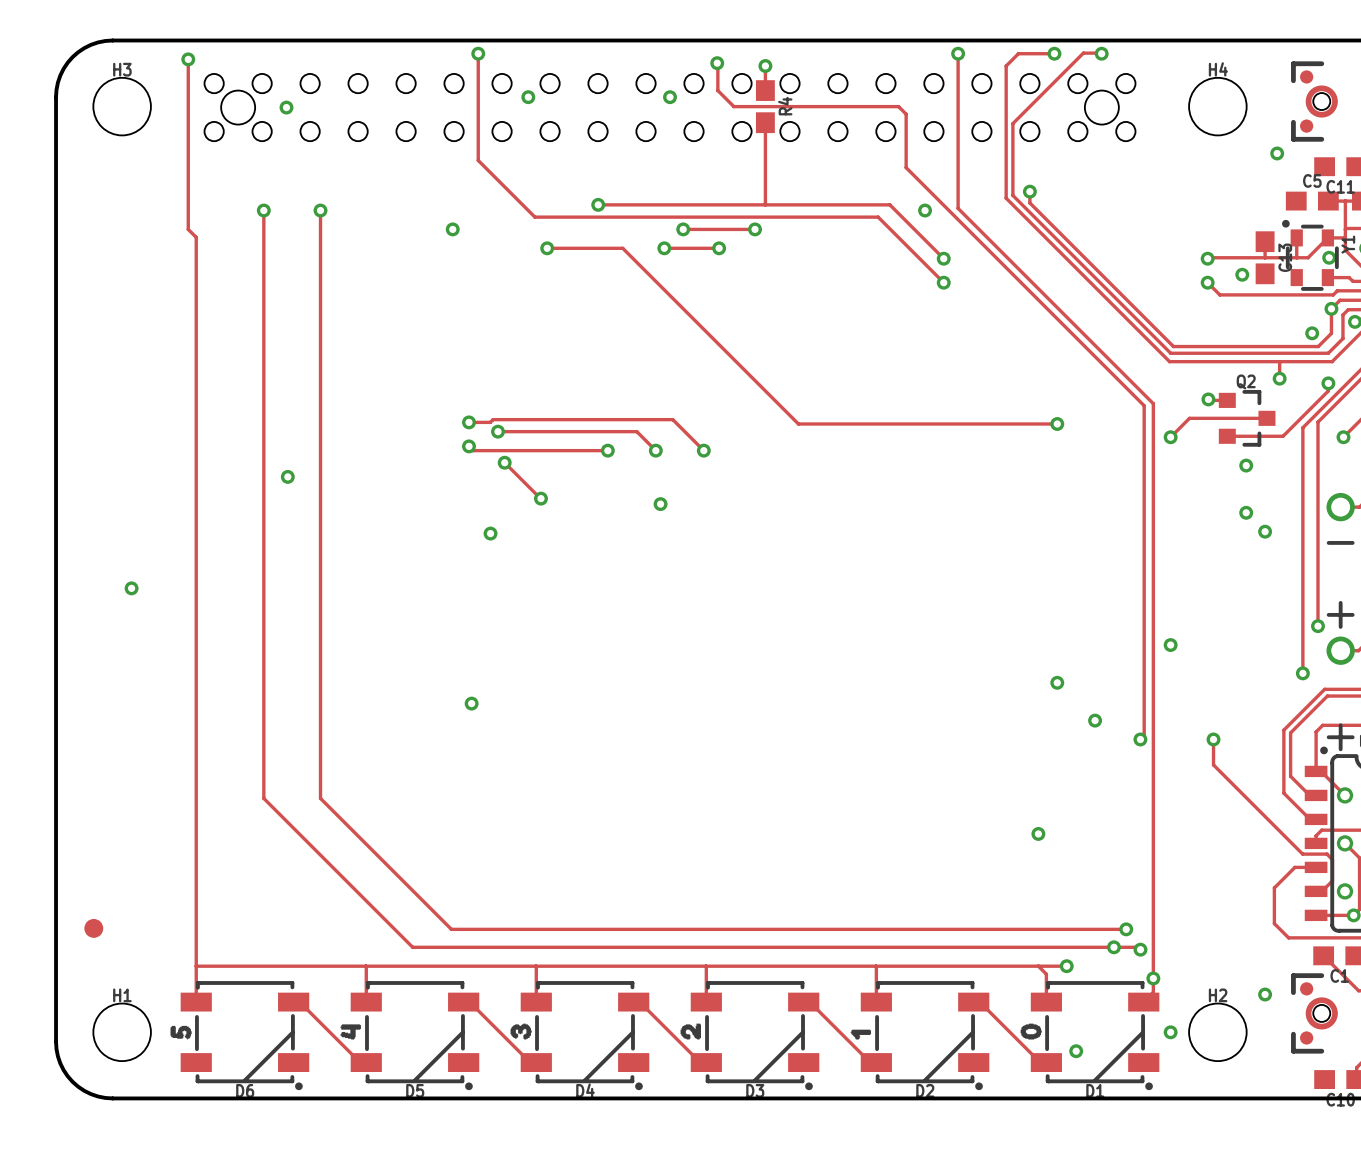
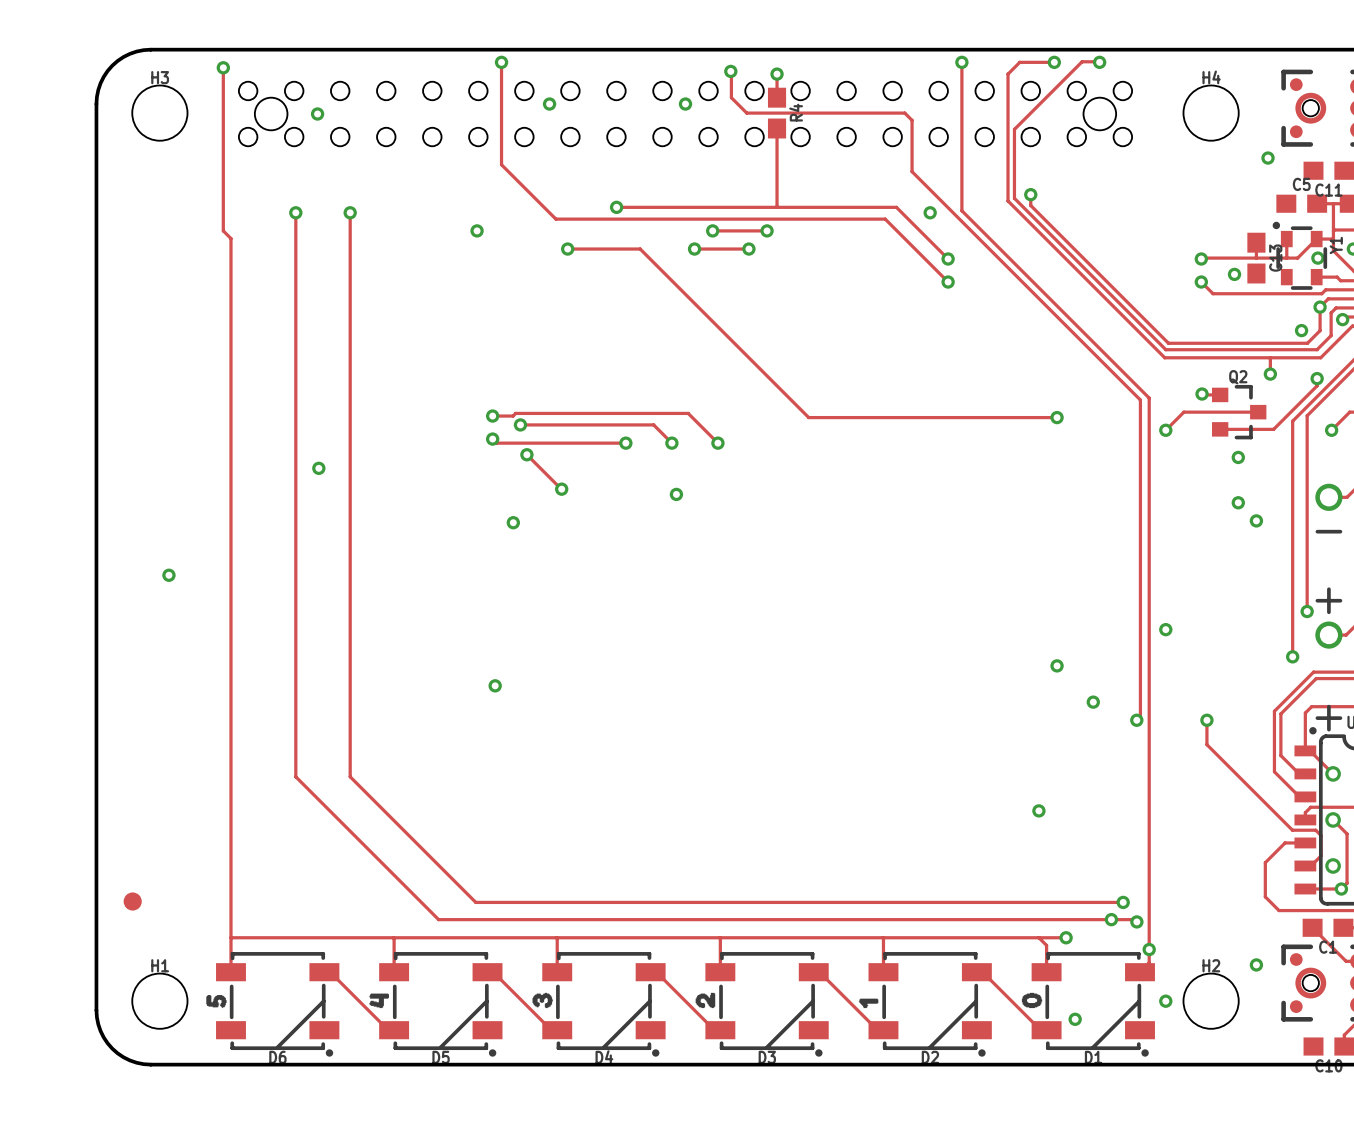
track: (683, 229) (698, 229) -> none
via: (683, 229) -> none
via: none -> (712, 230)
track: (664, 248) (679, 248) -> none
via: (664, 248) -> none
via: none -> (694, 249)
track: none -> (732, 249) (748, 249)
via: (719, 248) -> none
via: none -> (748, 249)

